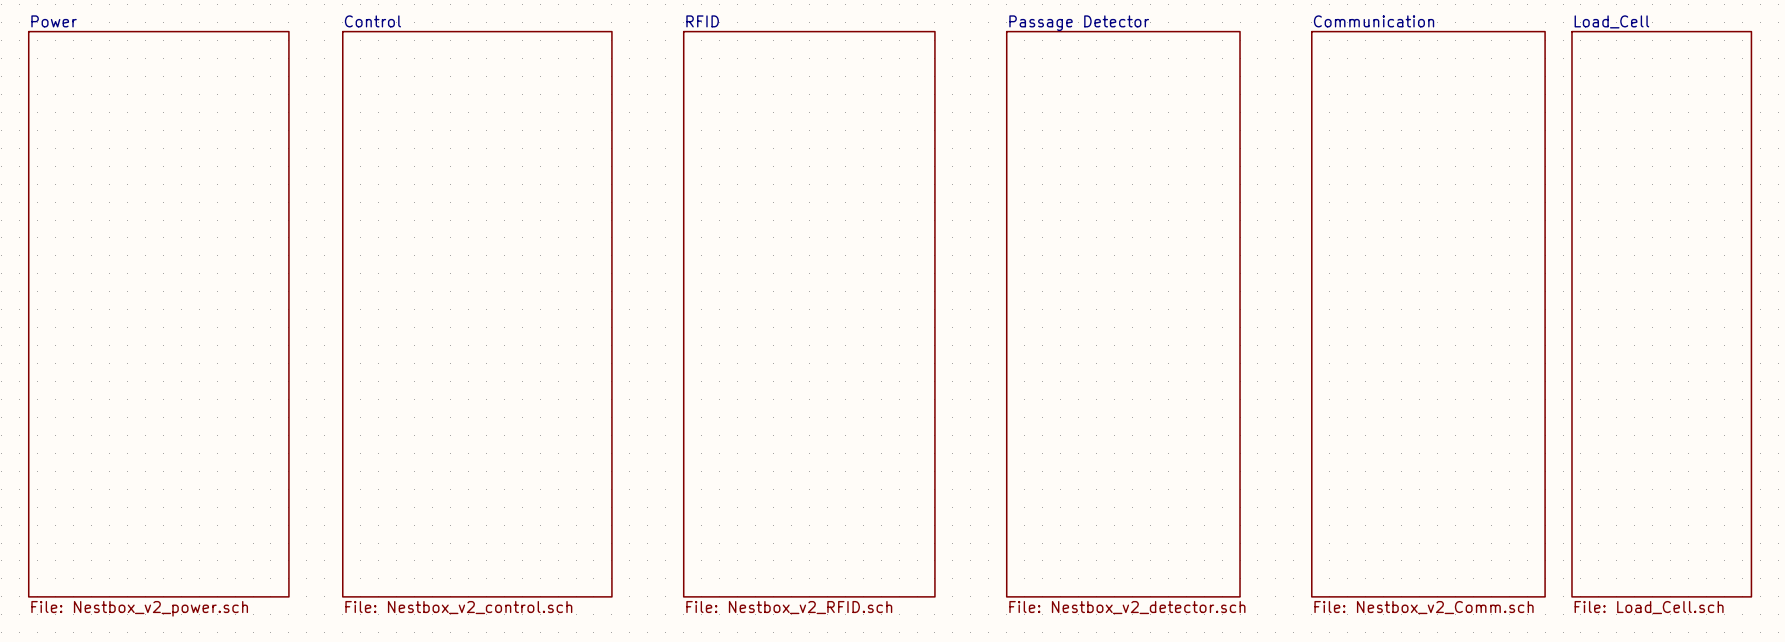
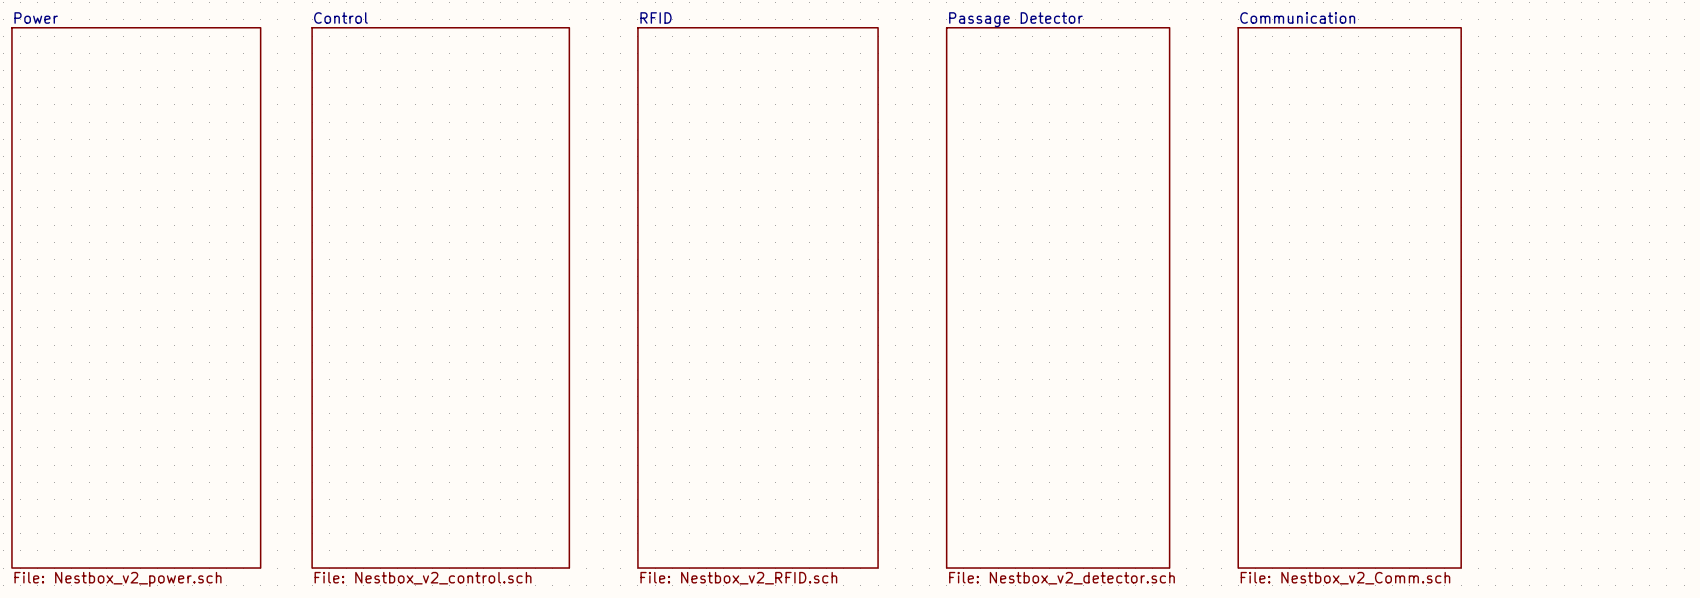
sheet Load_Cell: File: Load_Cell.sch (1661, 314) -> none

